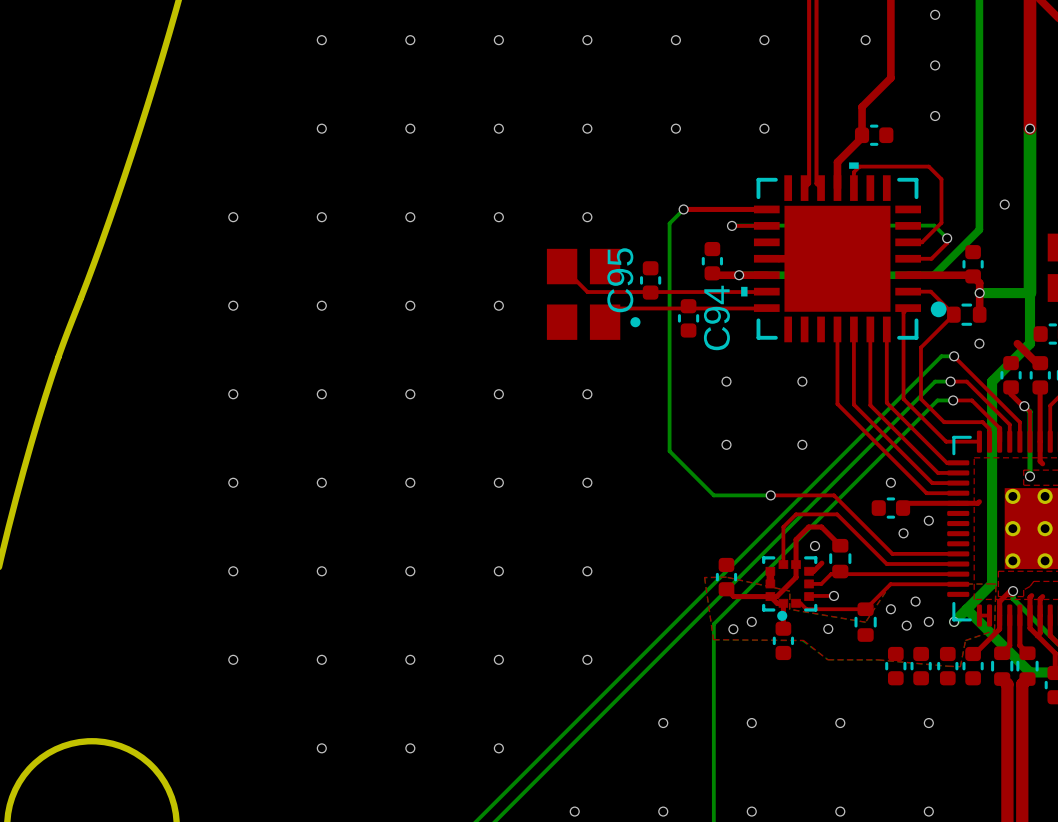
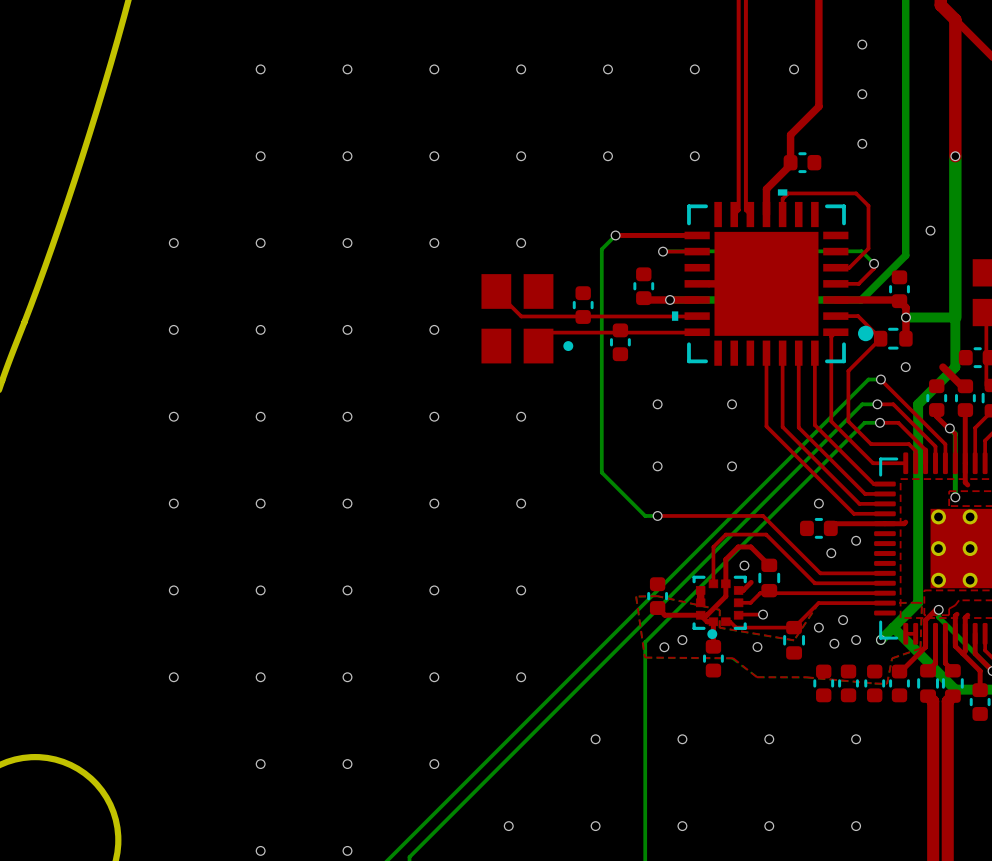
C95 name: C95 (620, 280) -> none
C94 name: C94 (716, 317) -> none
top track: none -> (657, 515) (701, 515)
bottom track: (726, 495) (770, 495) -> none
via position: (770, 495) -> (657, 515)

